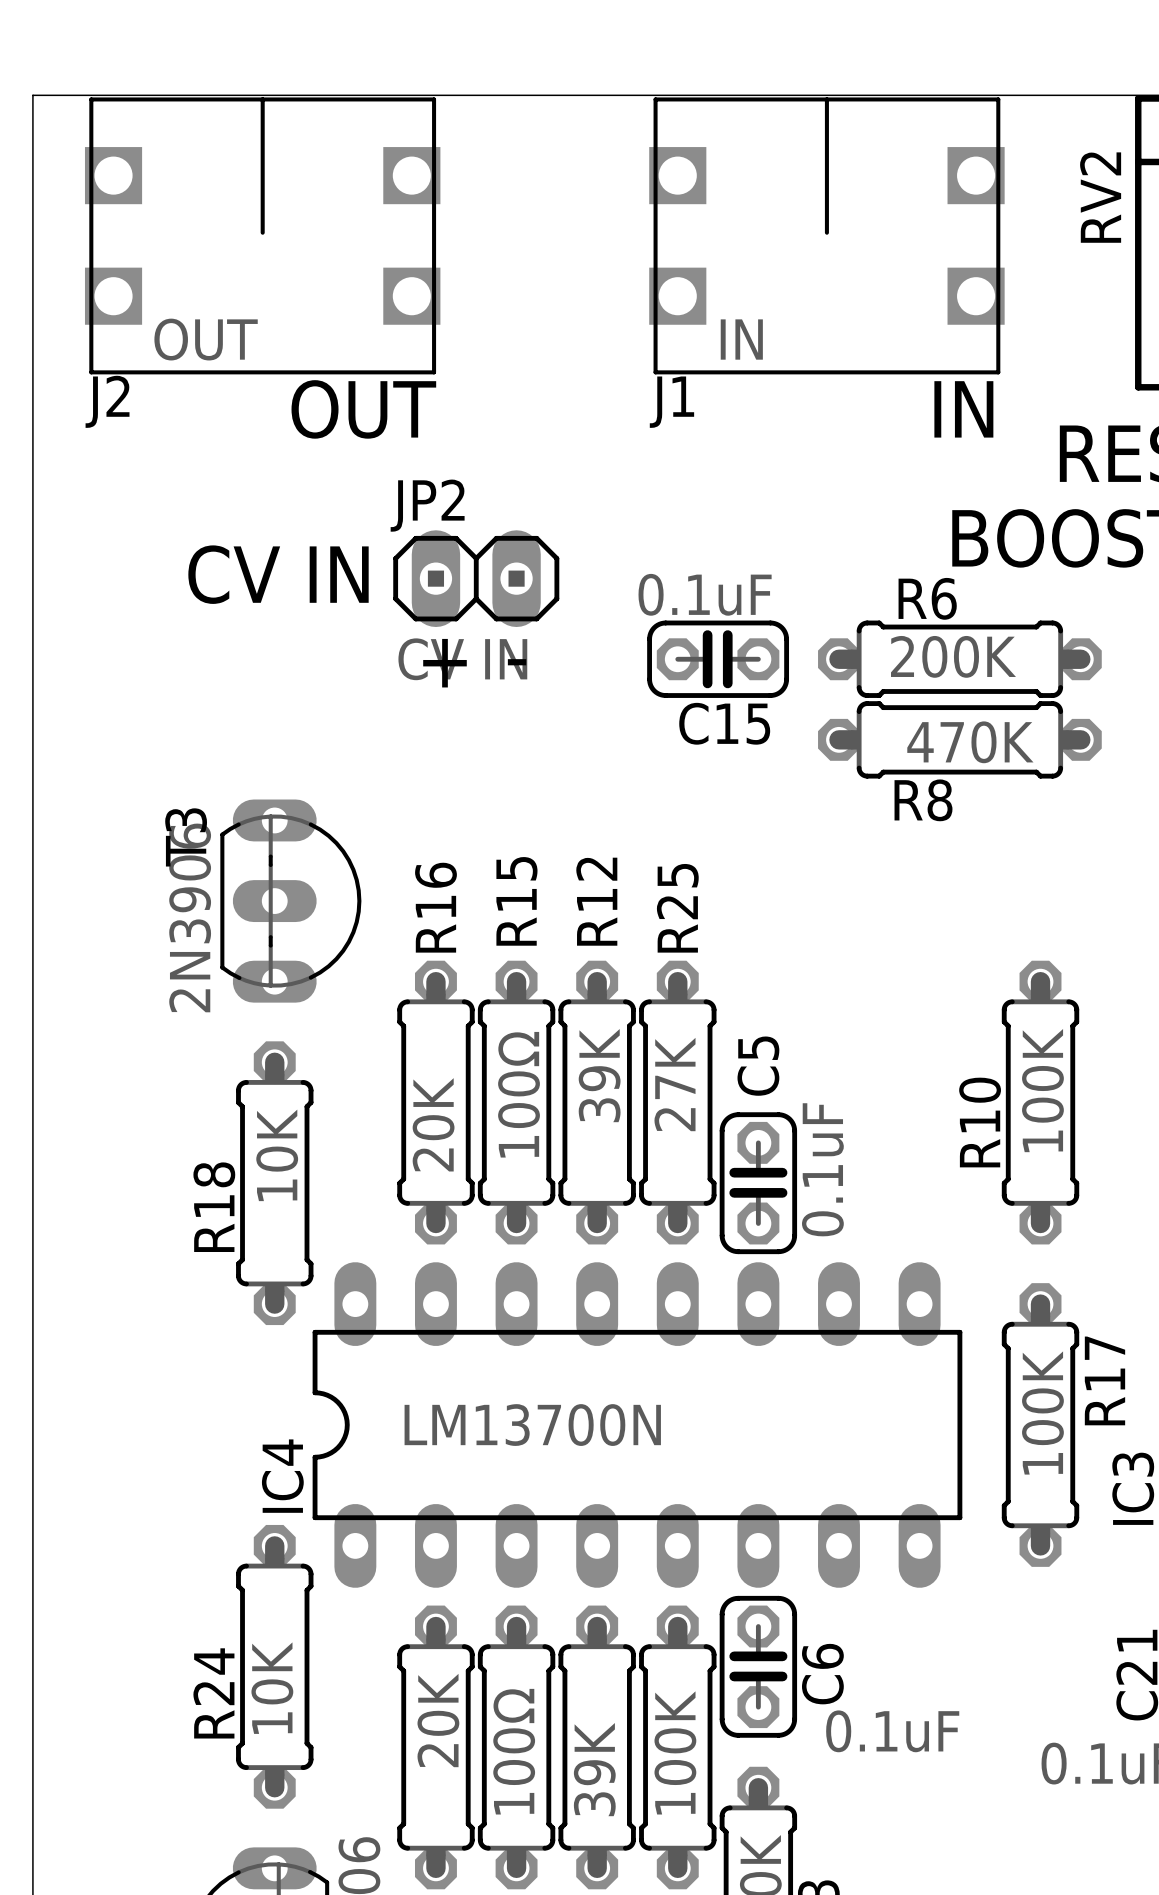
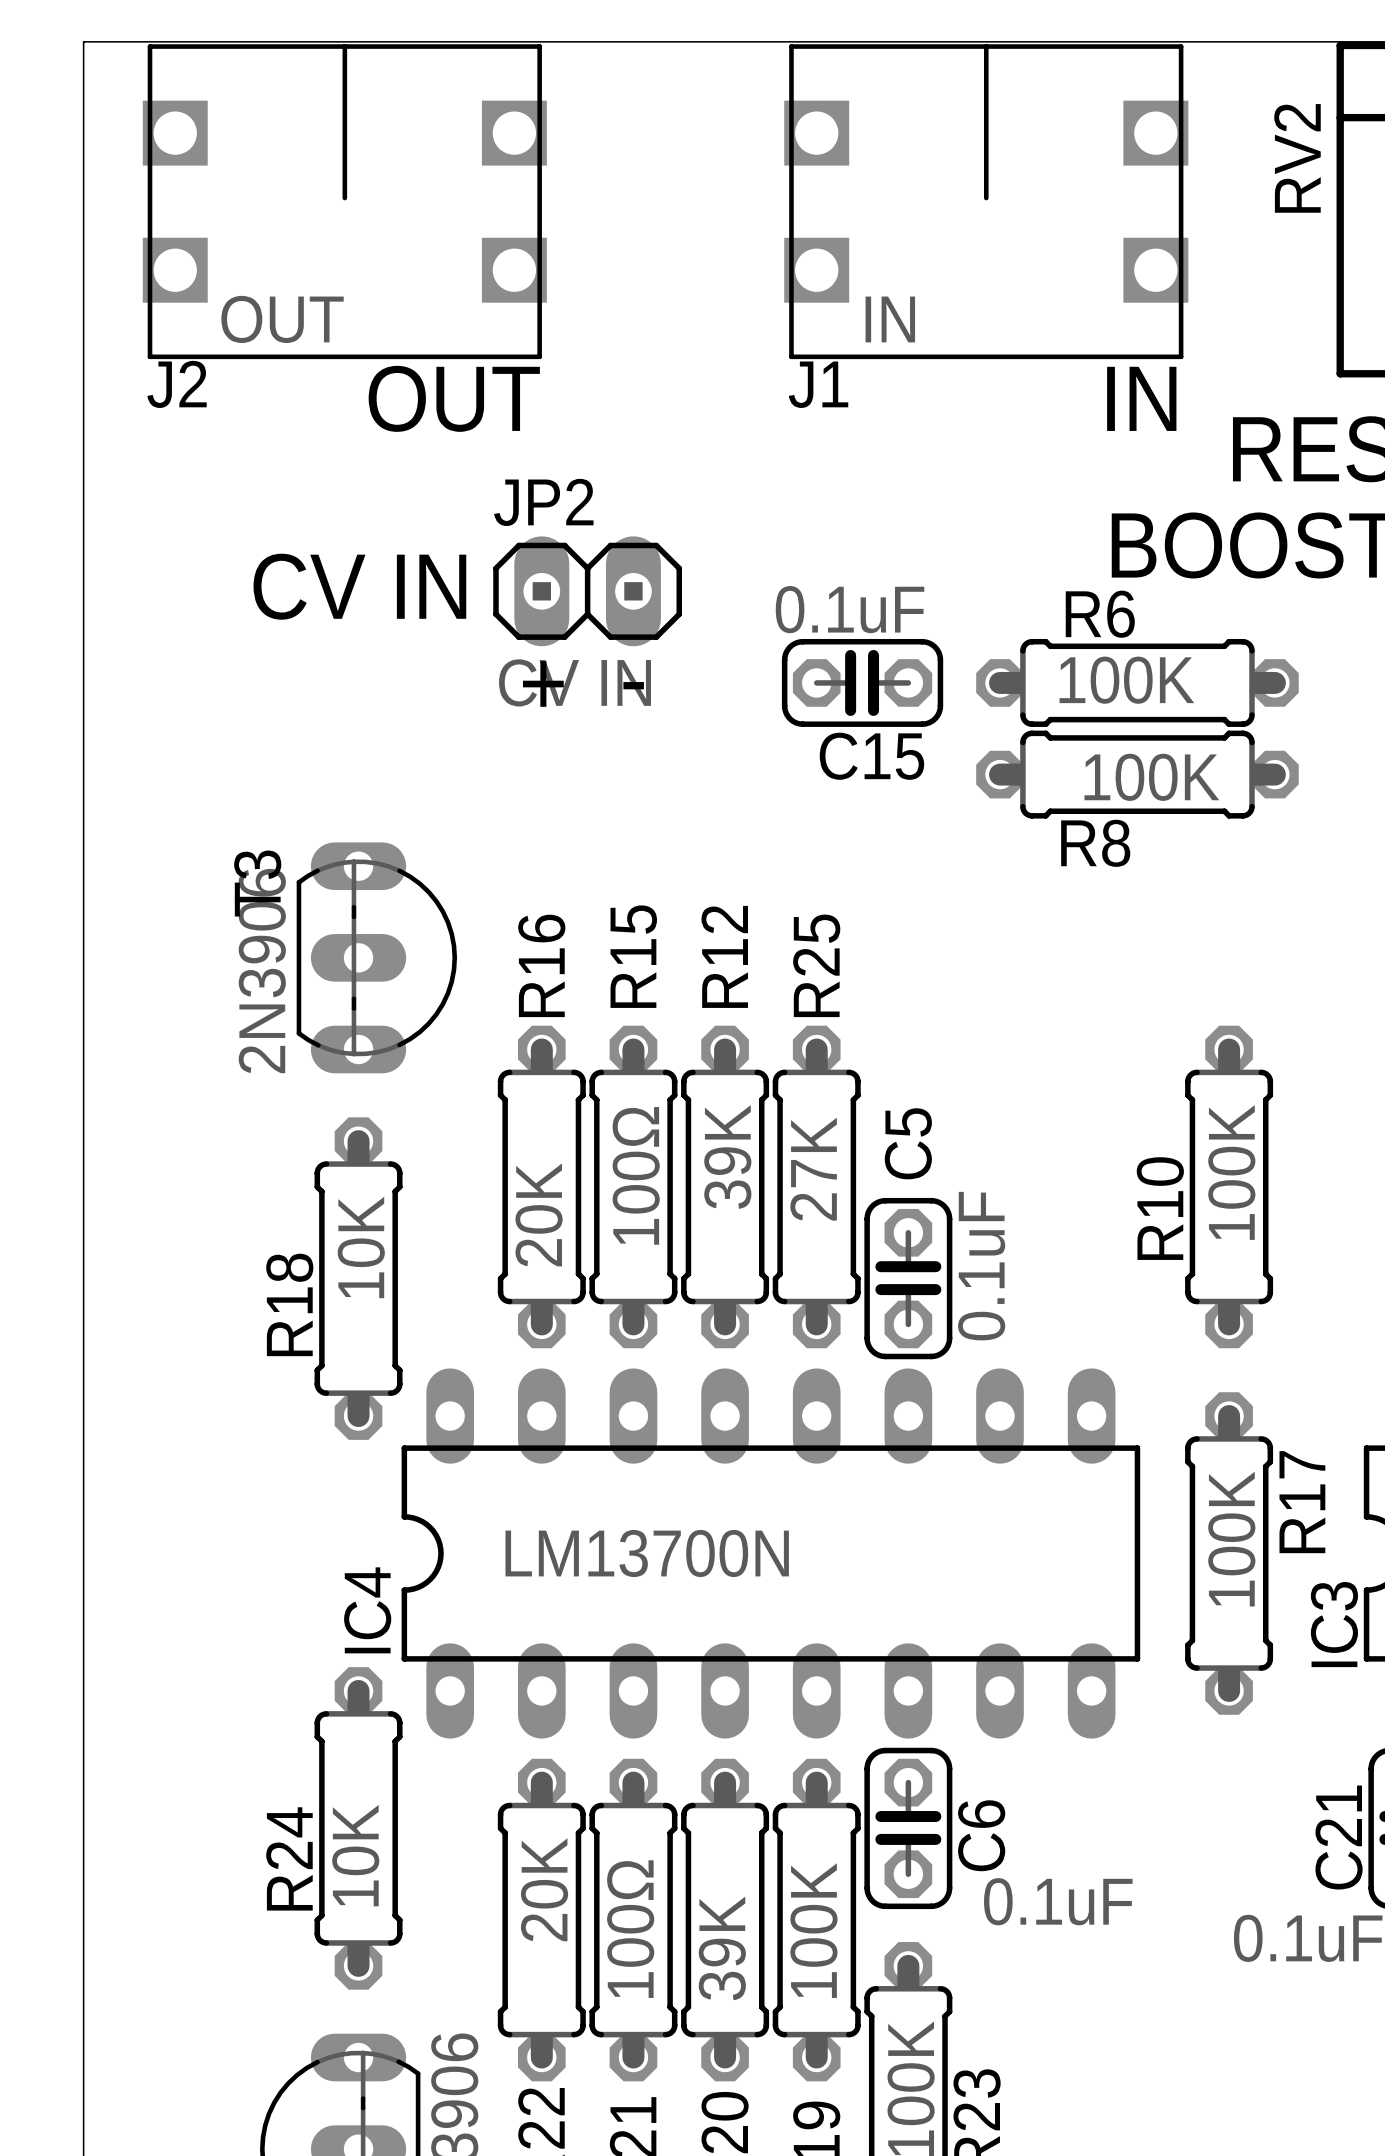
R6 value: 200K (953, 656) -> 100K (1126, 680)
R8 value: 470K (970, 742) -> 100K (1151, 777)

